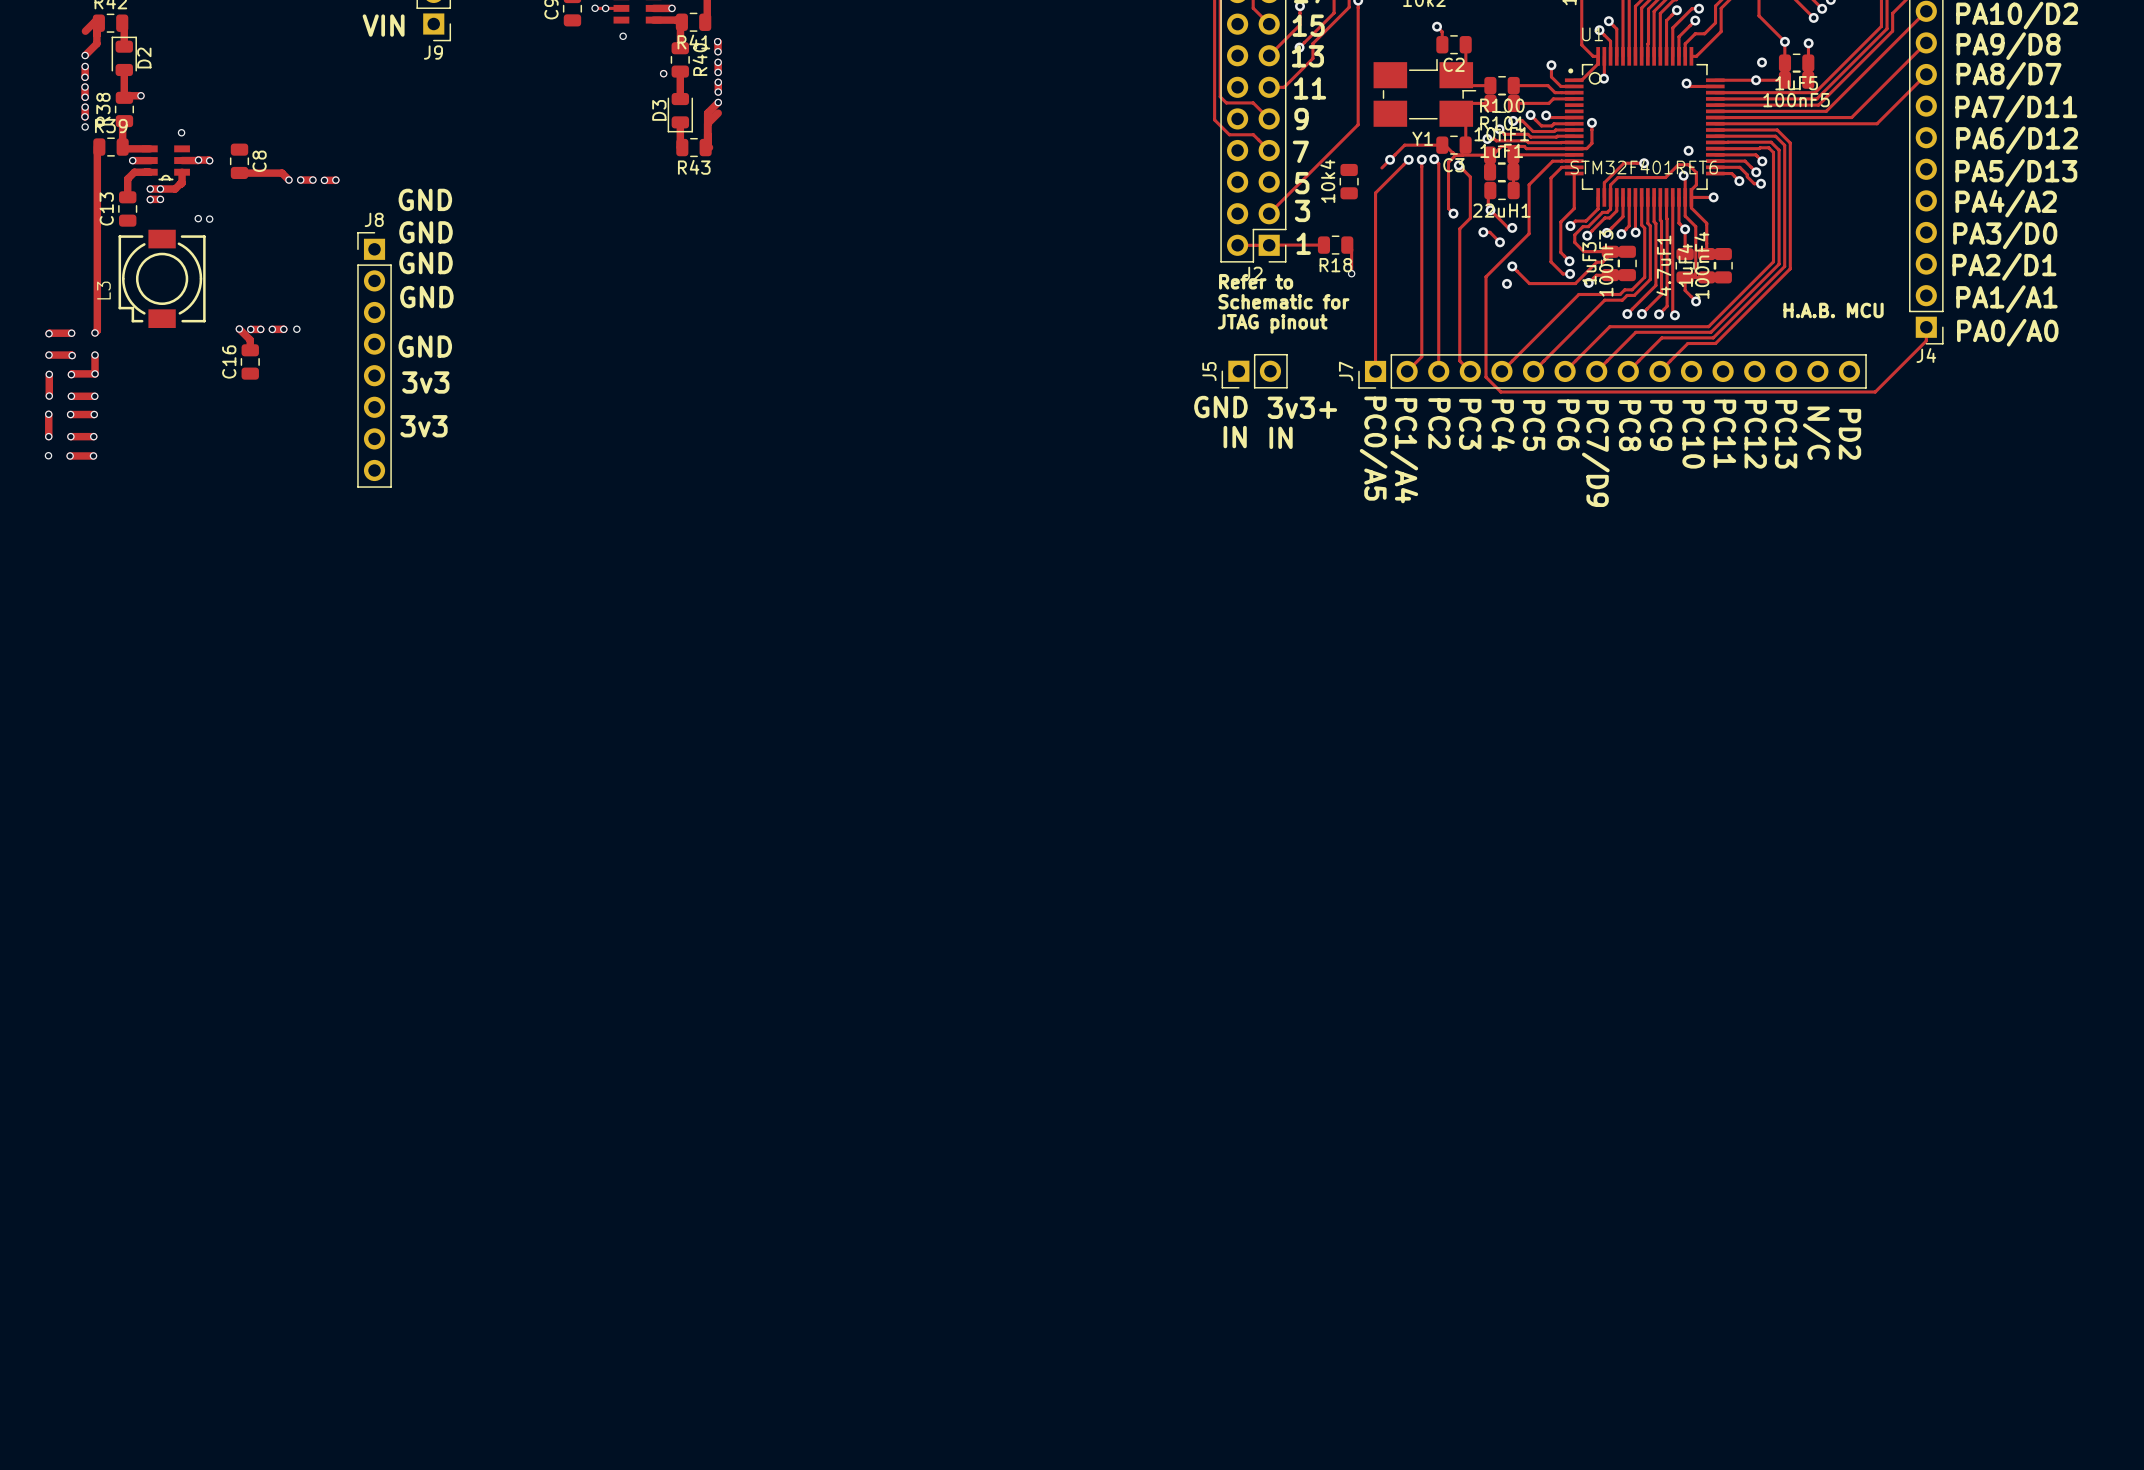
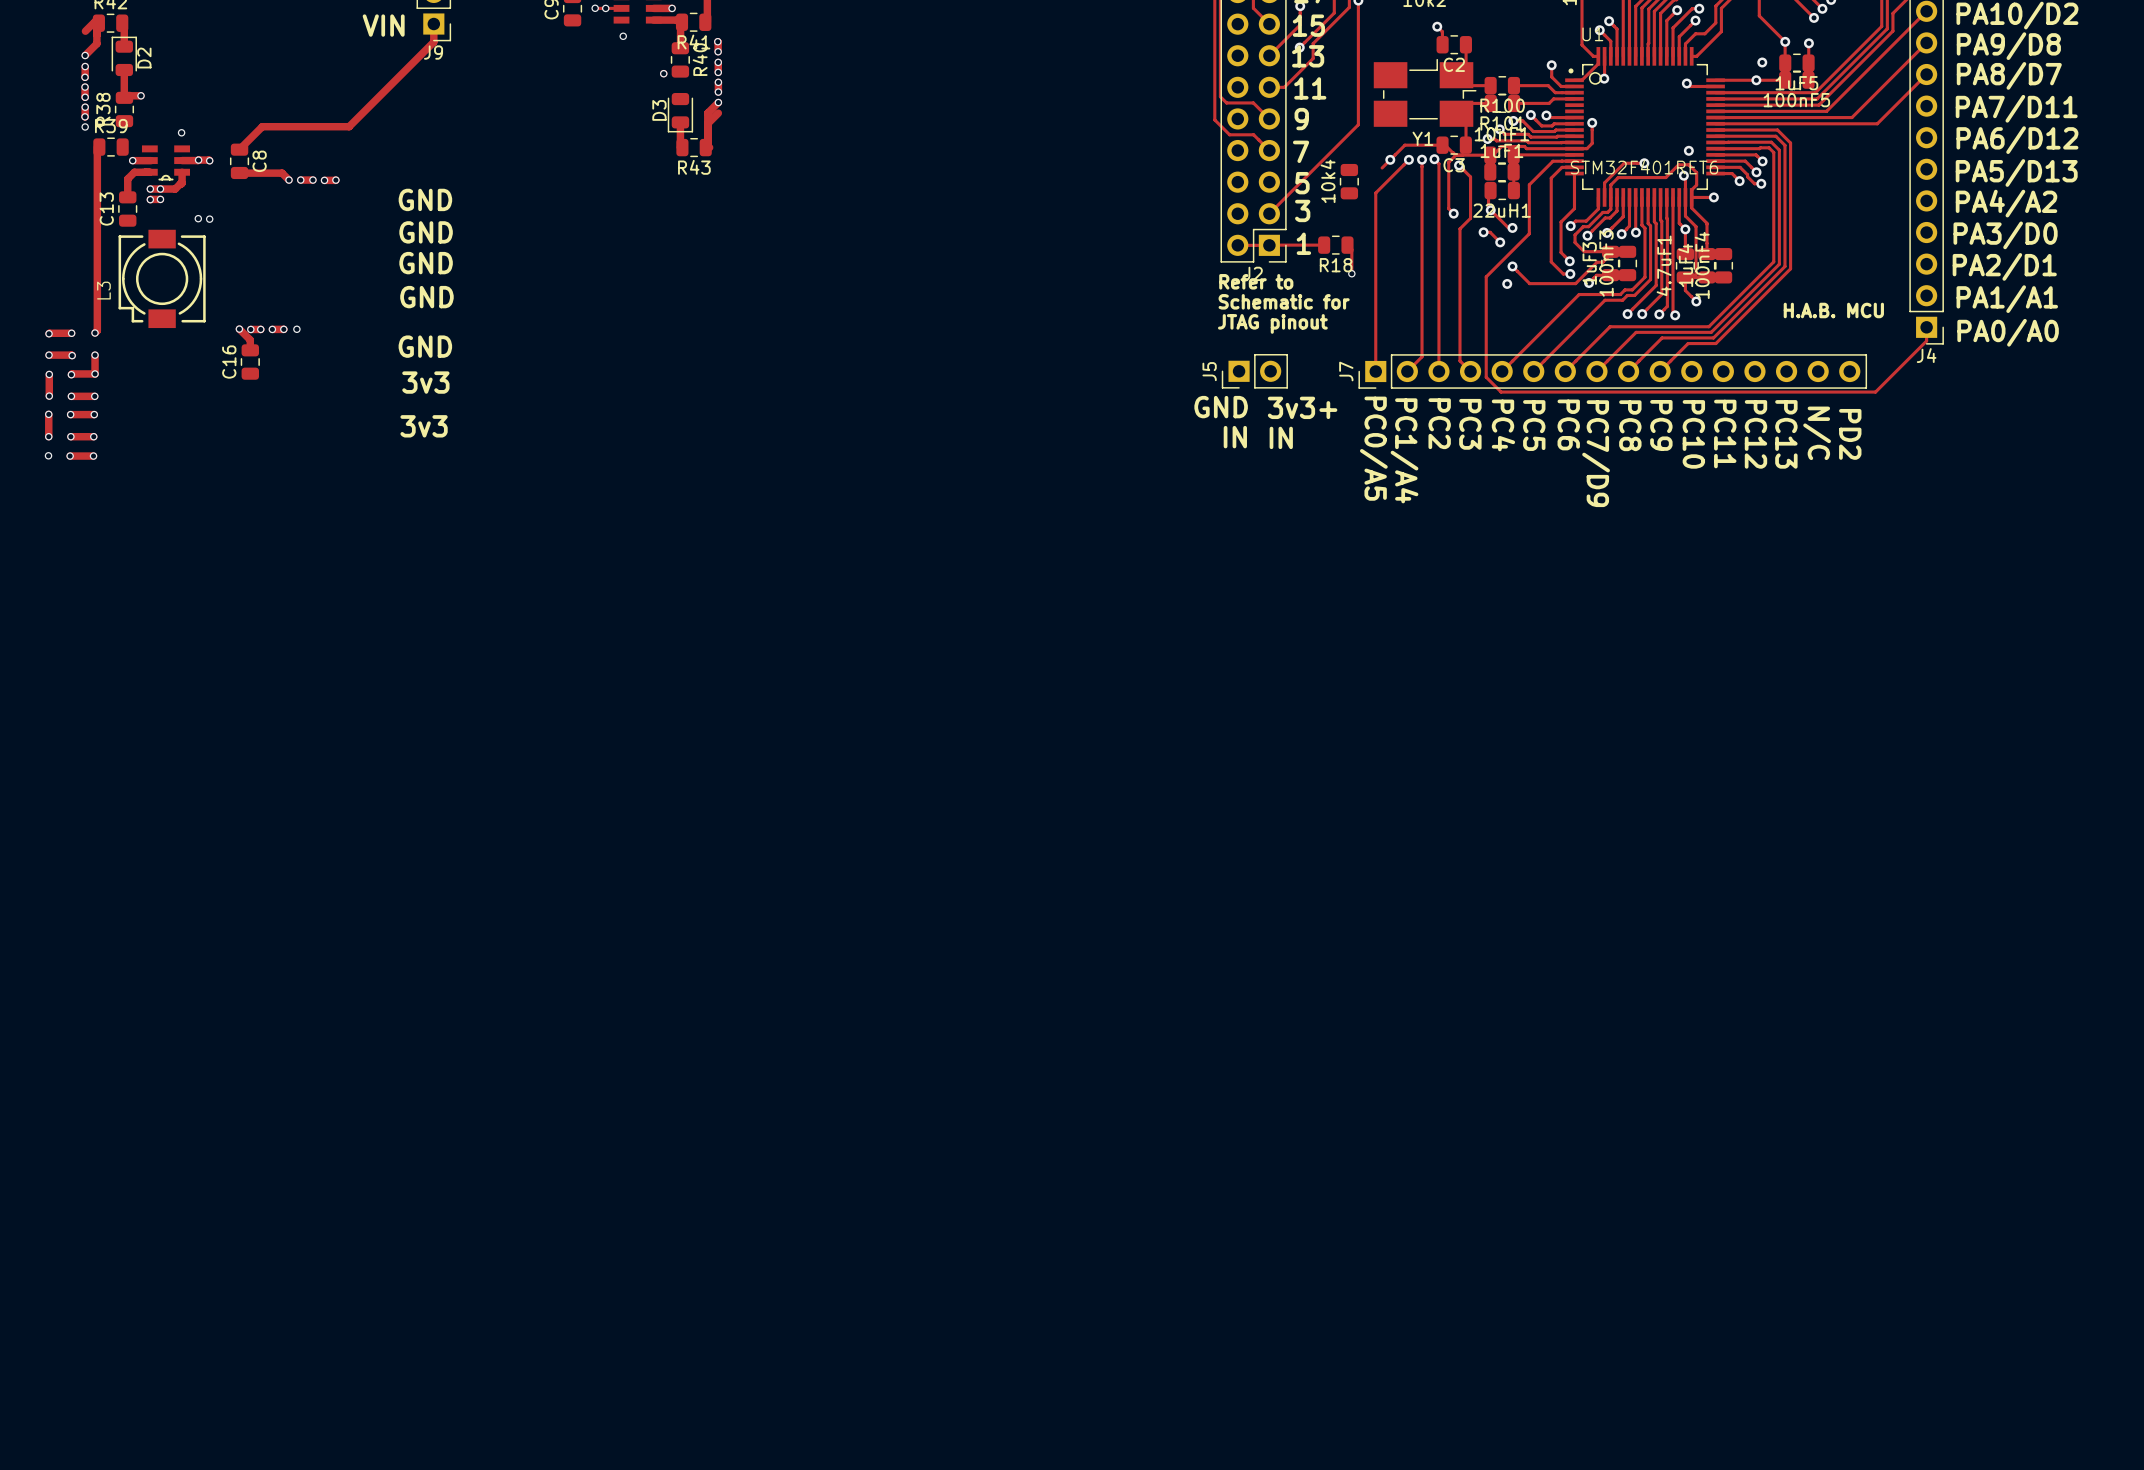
track: none -> (433, 24) (433, 42) (349, 126) (262, 126) (239, 149)
track: (680, 71) (680, 98) -> none
track: (124, 121) (122, 122) (122, 147) (124, 148) (149, 148) -> none
J8: (374, 359) -> none

